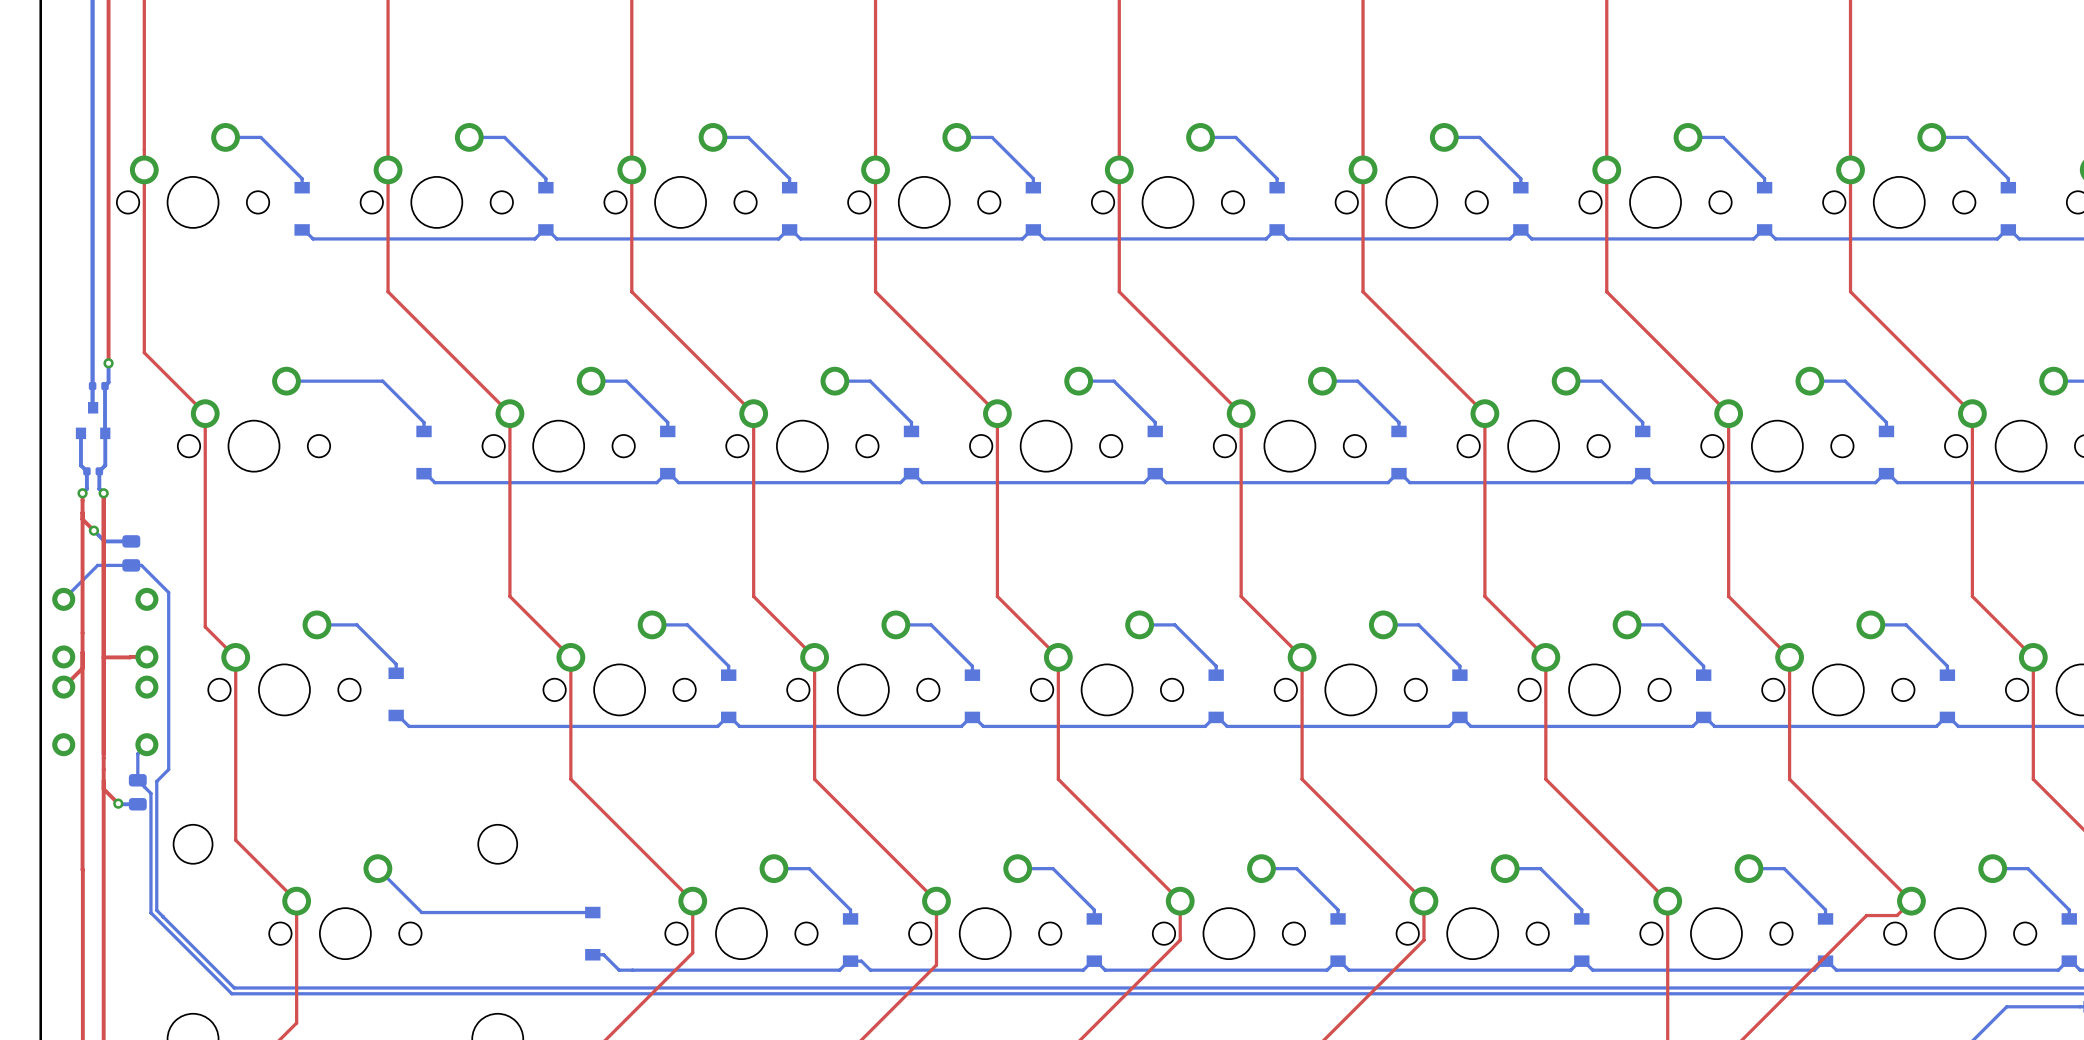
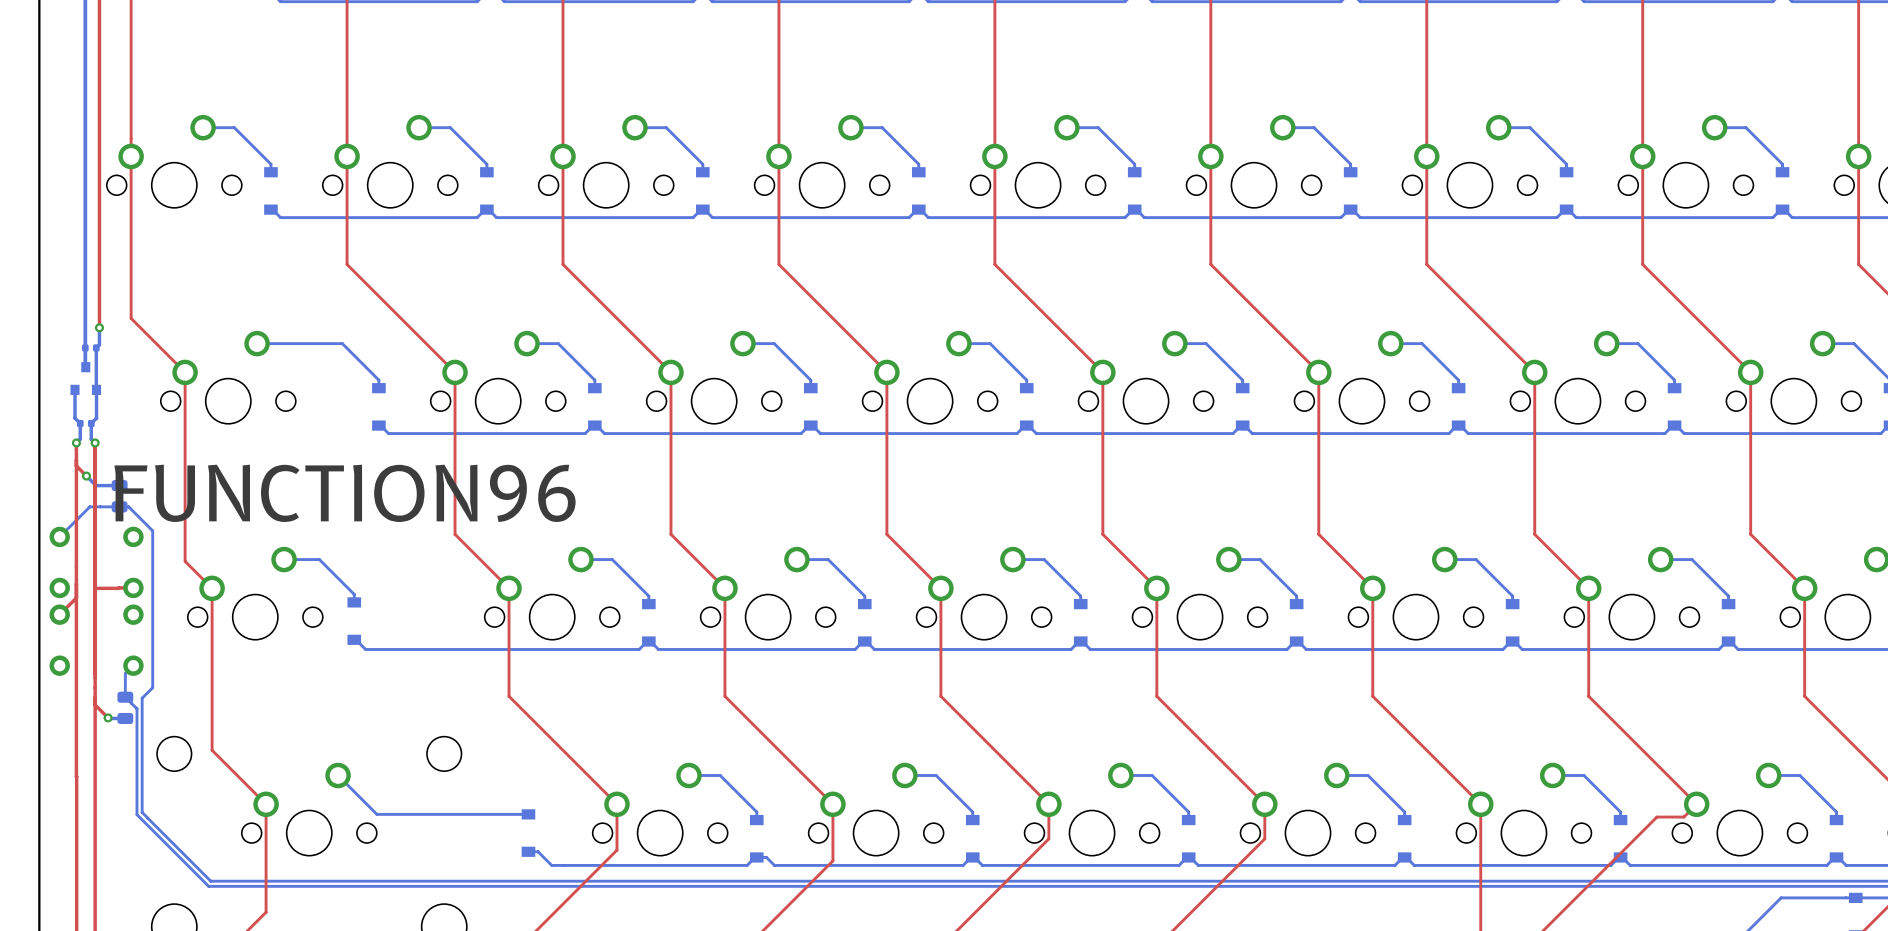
text: none -> FUNCTION96 (345, 493)

